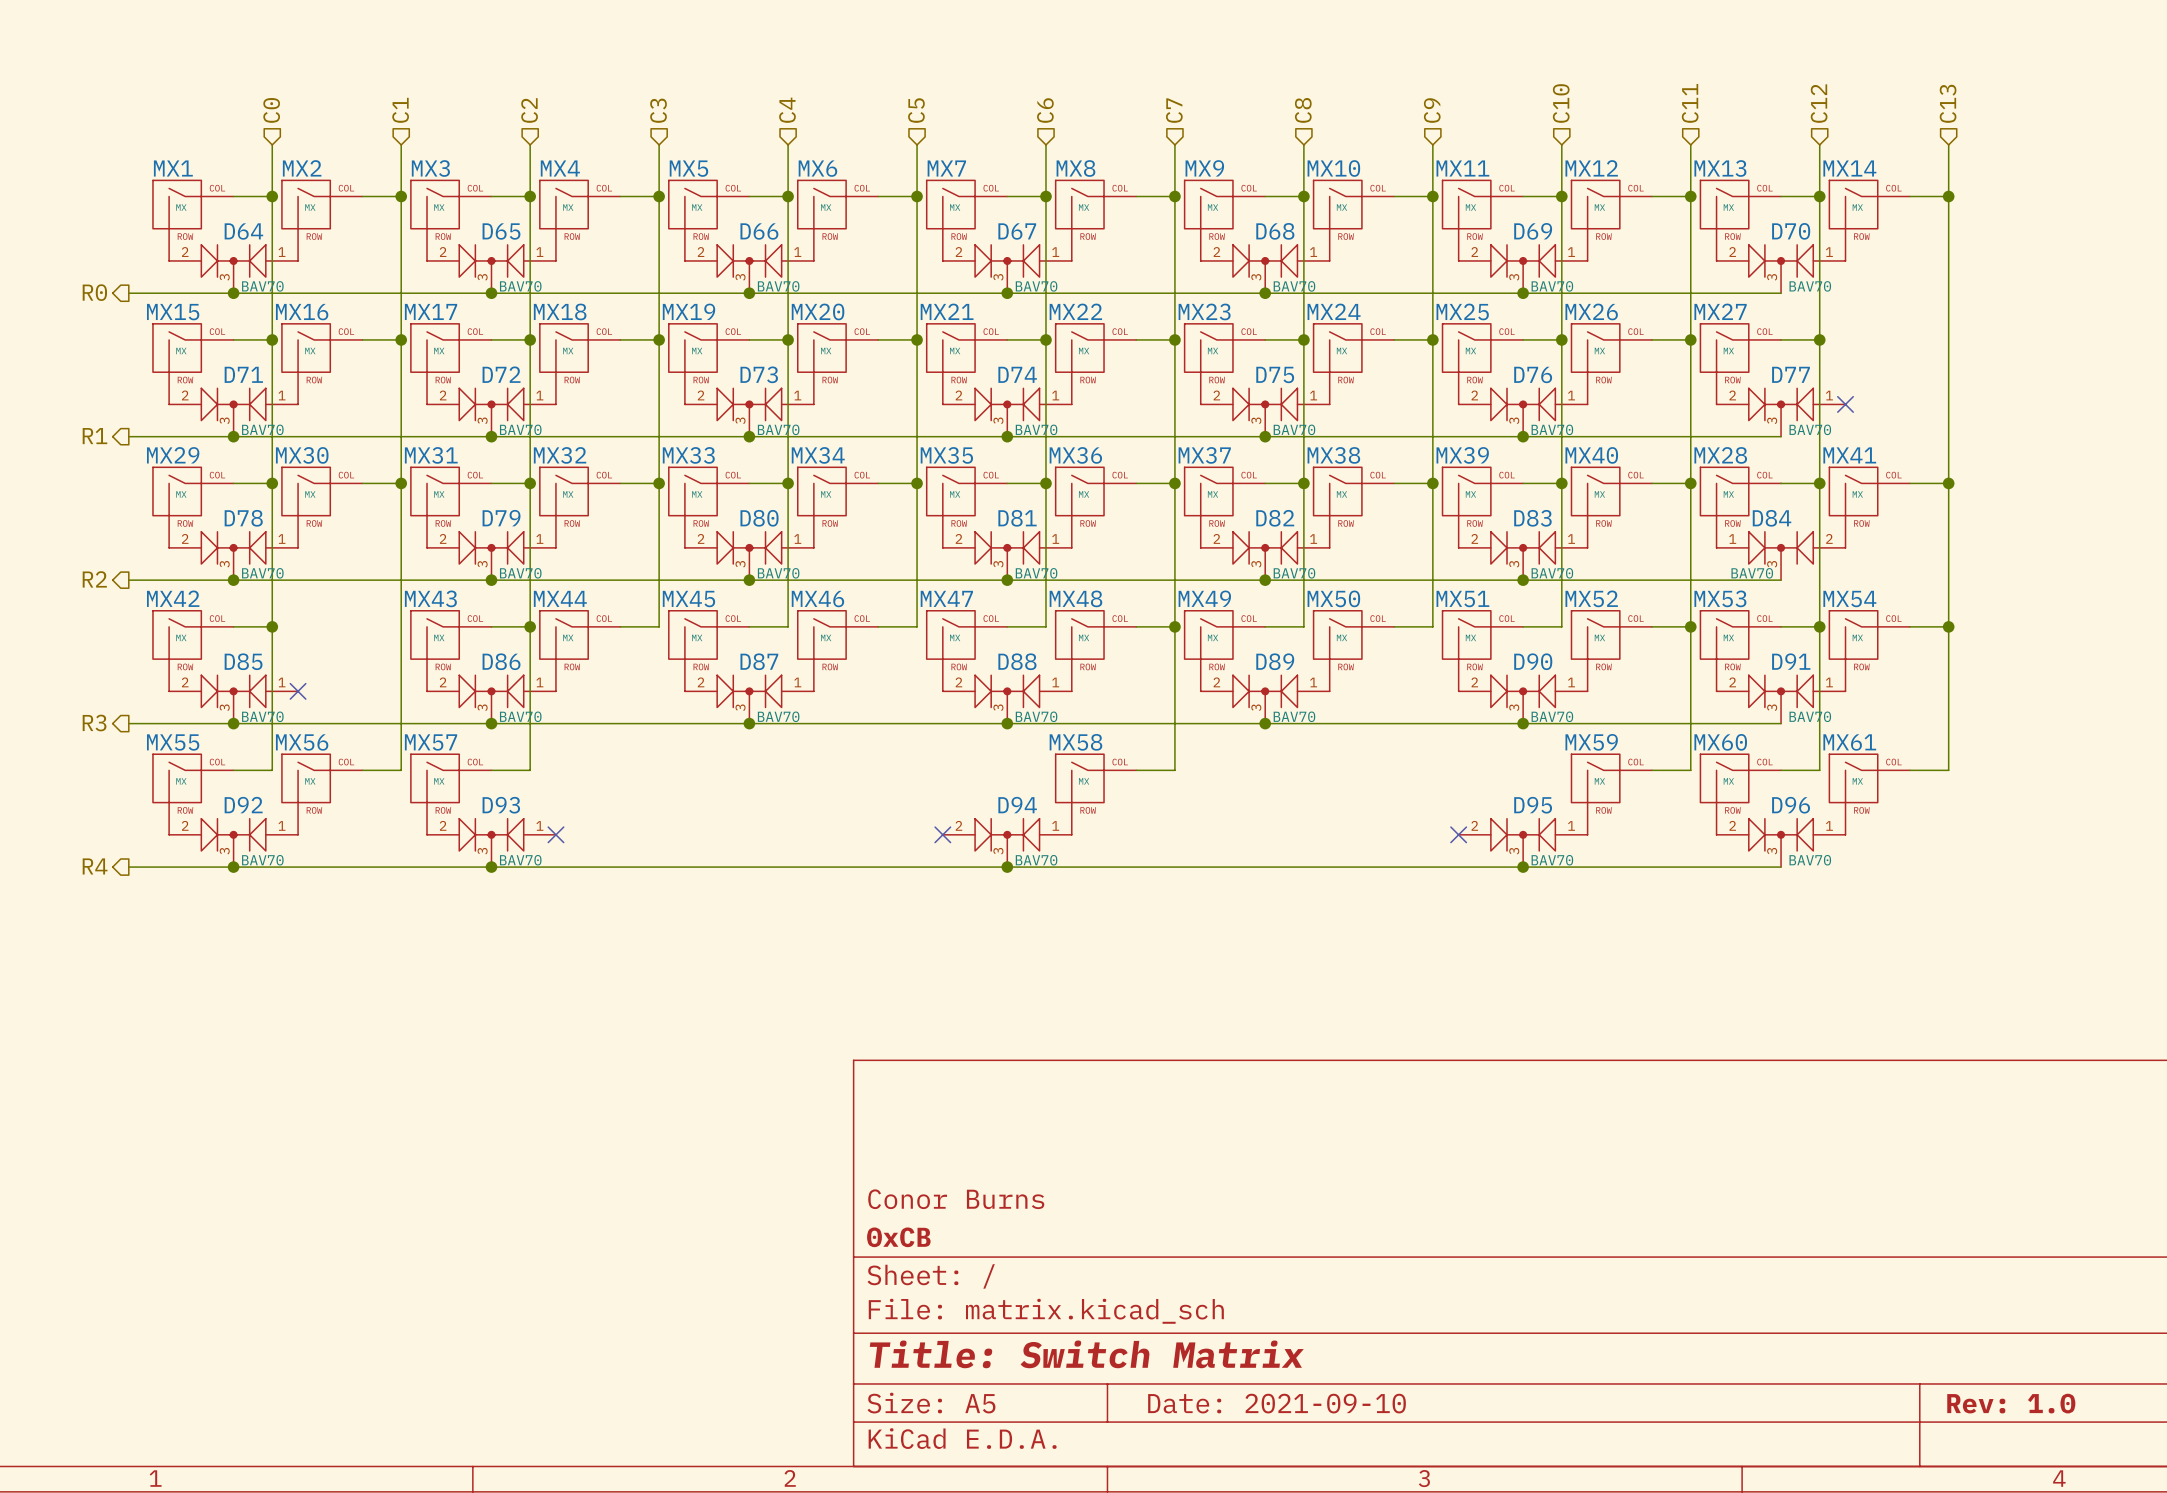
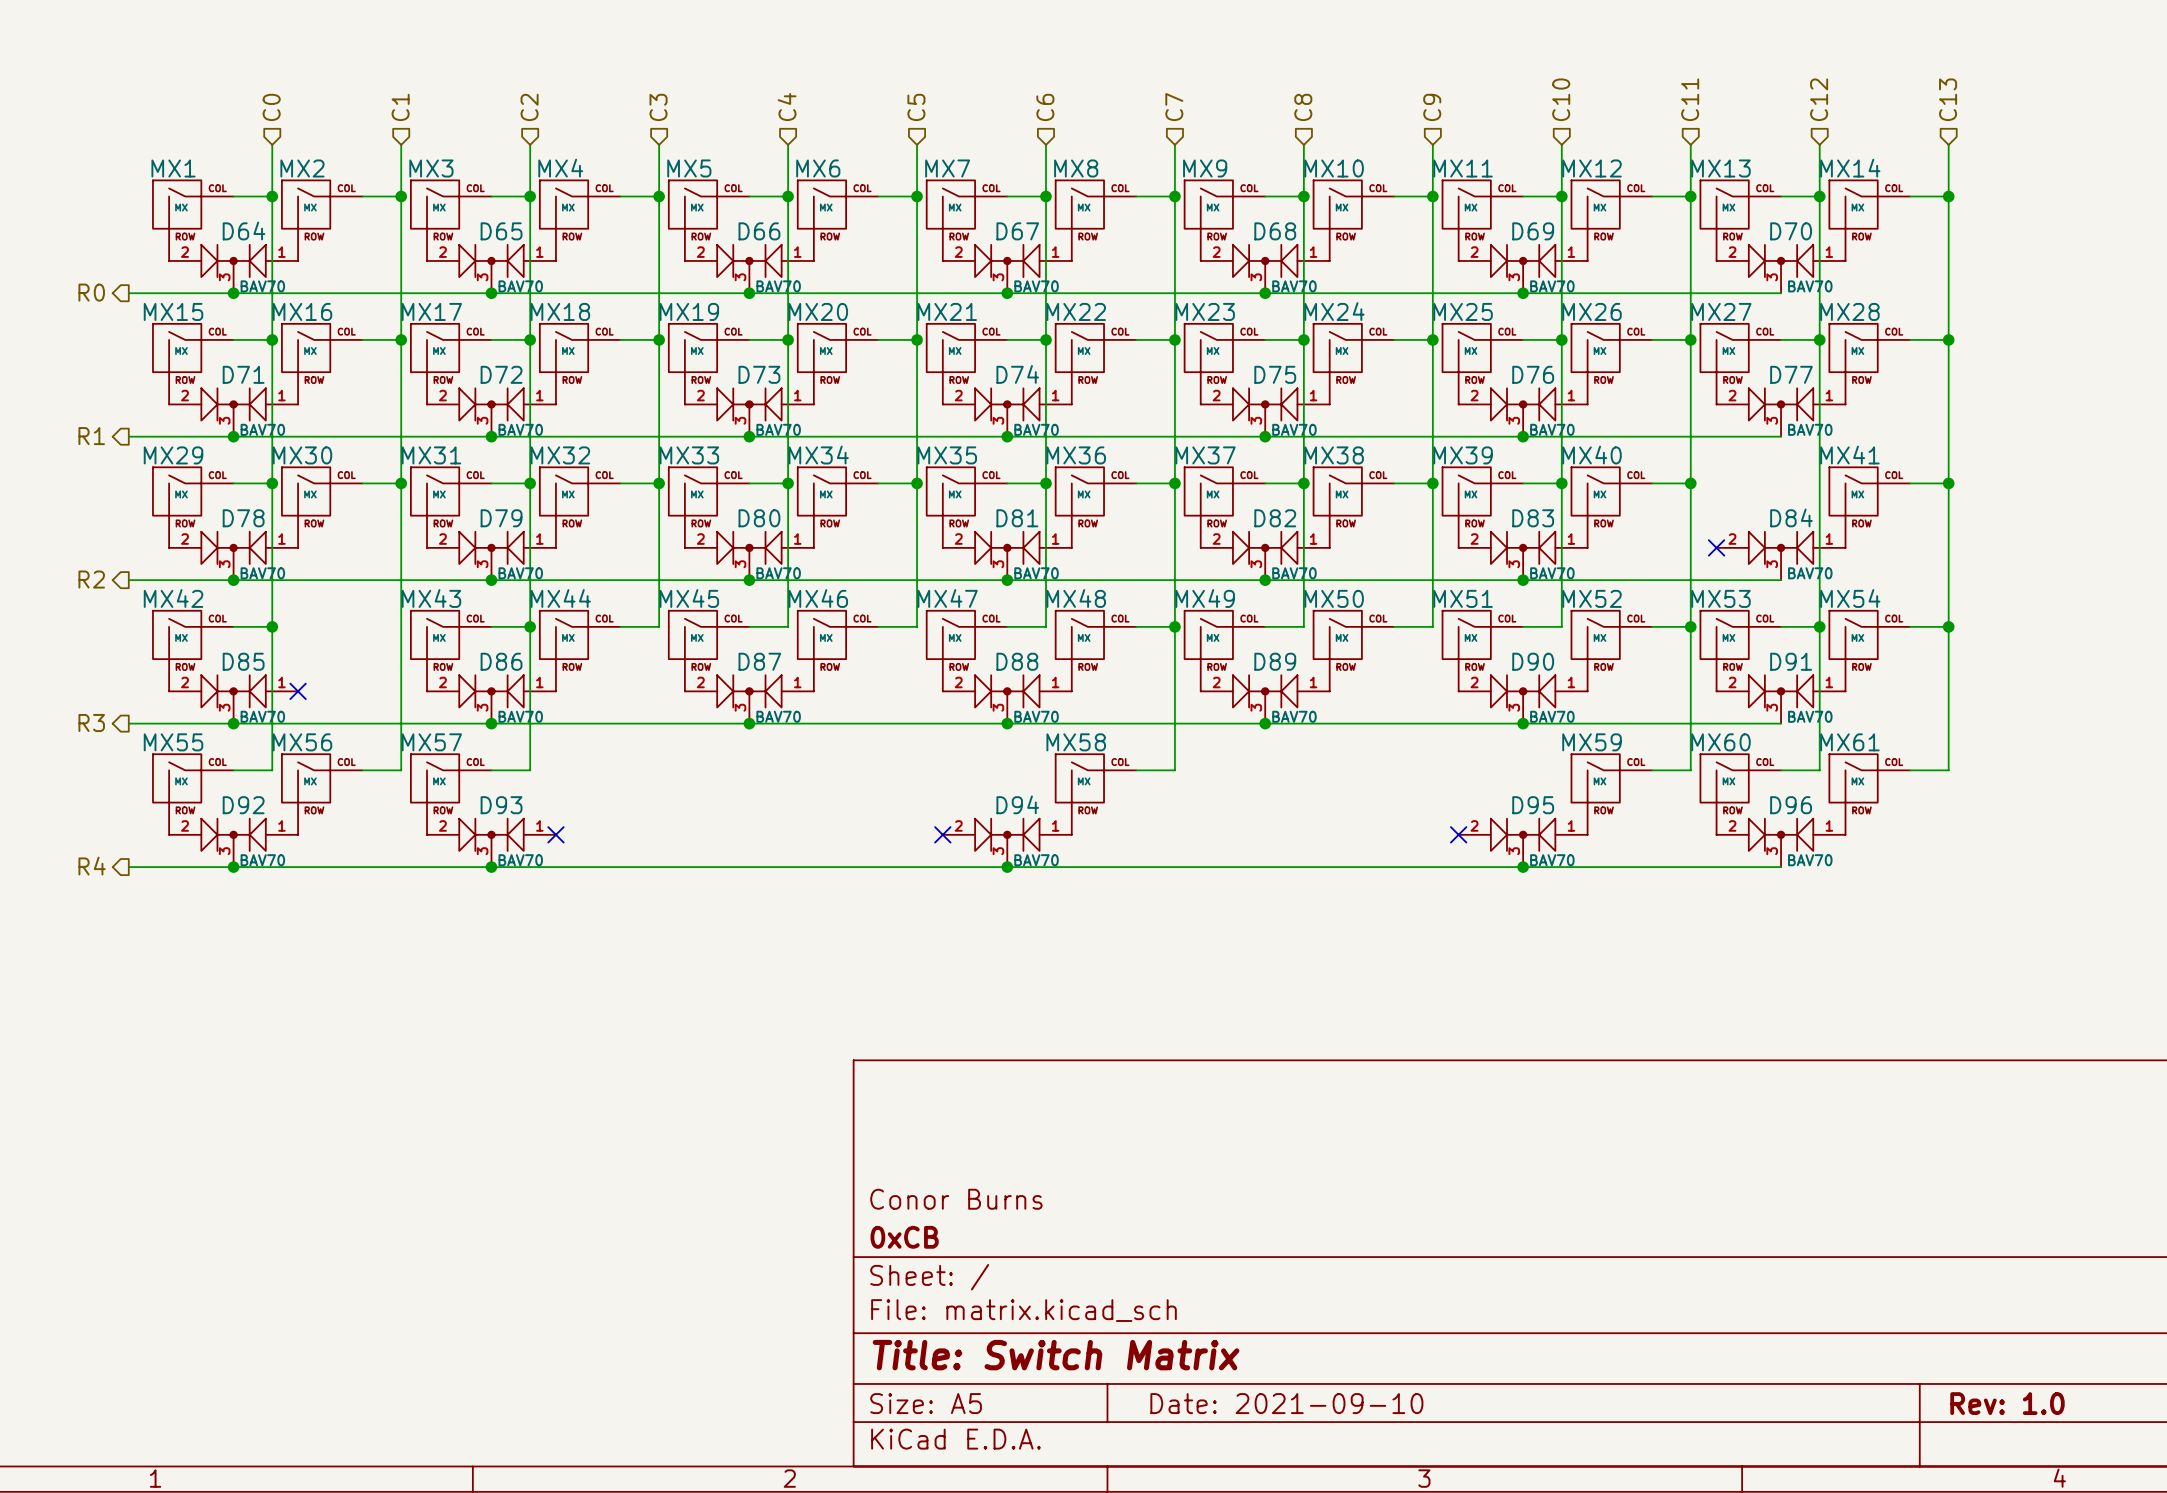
junction: none -> (1948, 339)
no-connect mark: (1845, 404) -> none
wire: (1781, 483) (1819, 483) -> (1909, 339) (1948, 339)
junction: (1819, 483) -> none
MX28 position: (1740, 507) -> (1869, 364)
no-connect mark: none -> (1716, 547)
D84 flip: as is (1781, 547) -> left-right (1781, 547)

